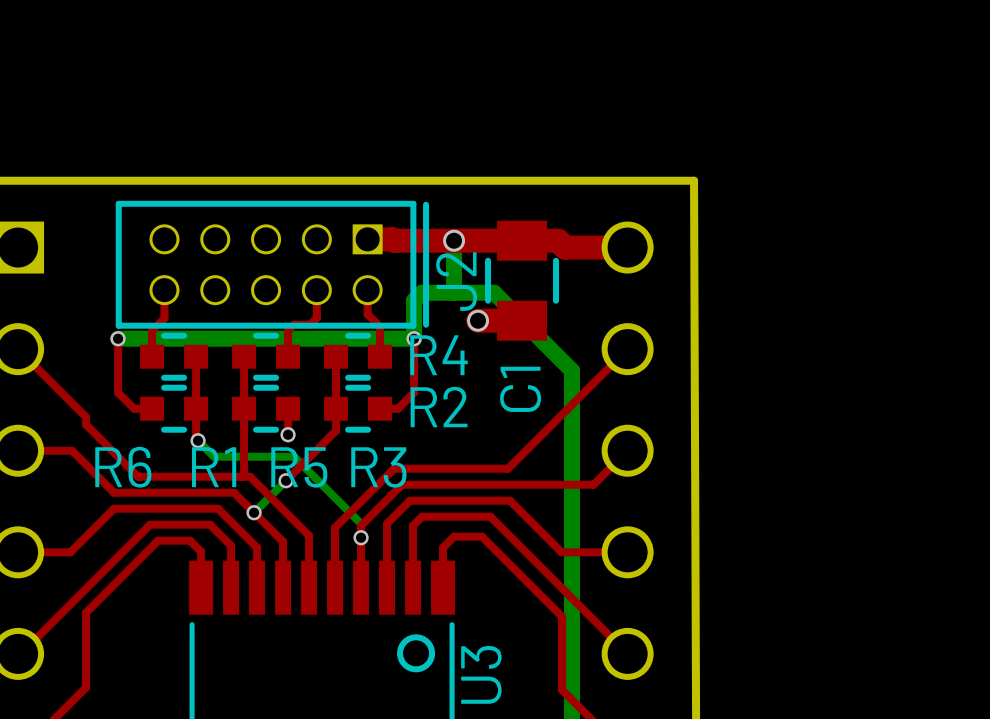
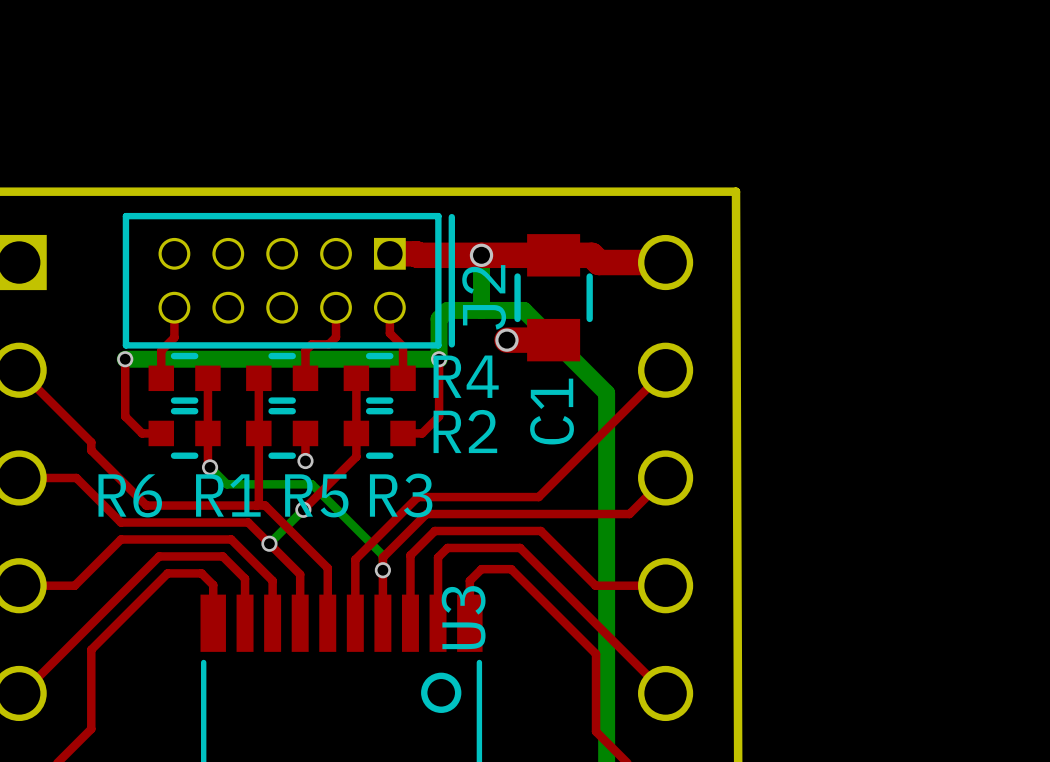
U3 name position: U3 (481, 674) -> U3 (463, 617)

